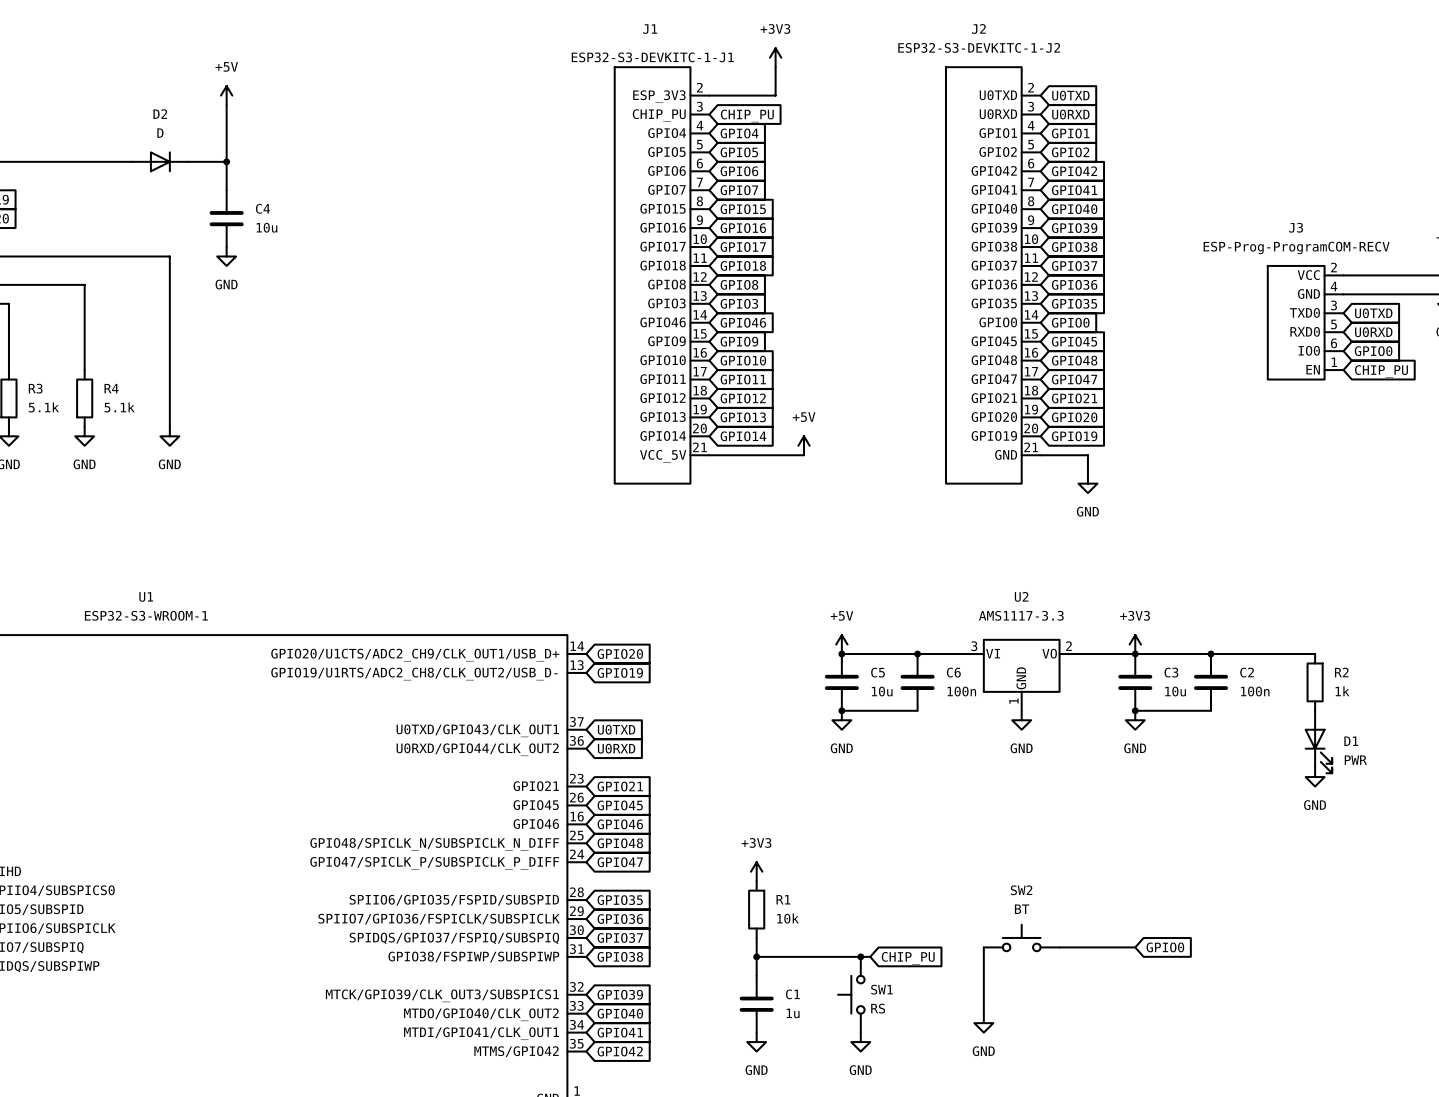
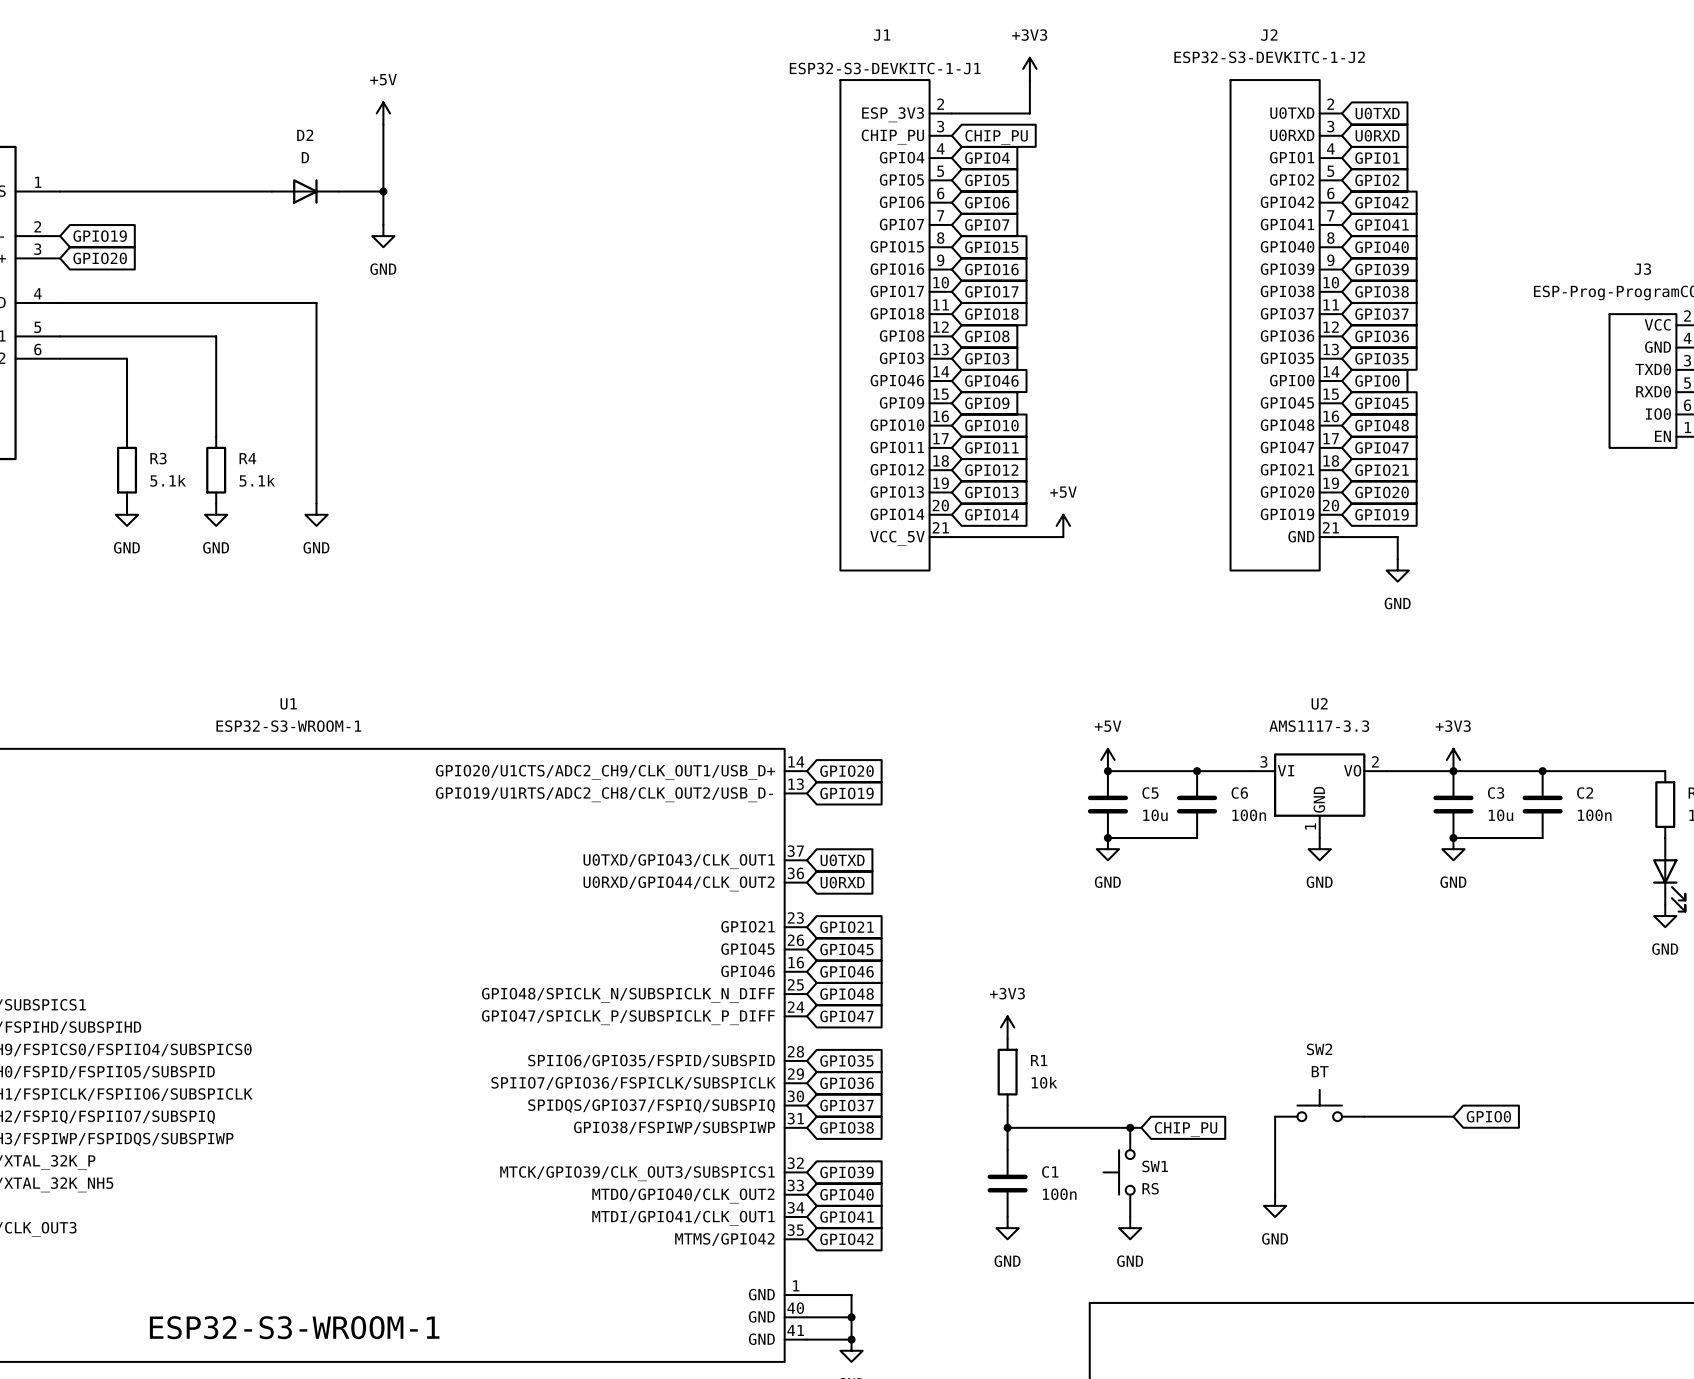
C4: 10u (226, 218) -> none
power symbol position: GND (226, 256) -> GND (383, 236)
C1 value: 1u (793, 1013) -> 100n (1059, 1194)

